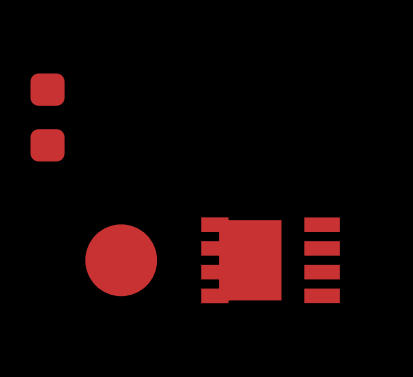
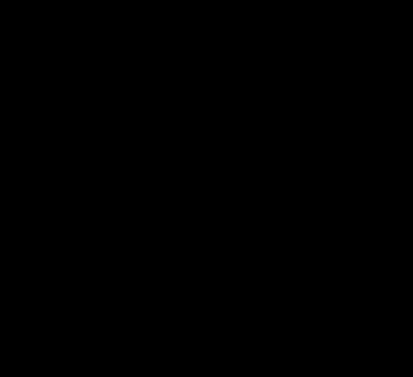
part: (47, 117) -> none
part: (121, 260) -> none
part: (270, 260) -> none

